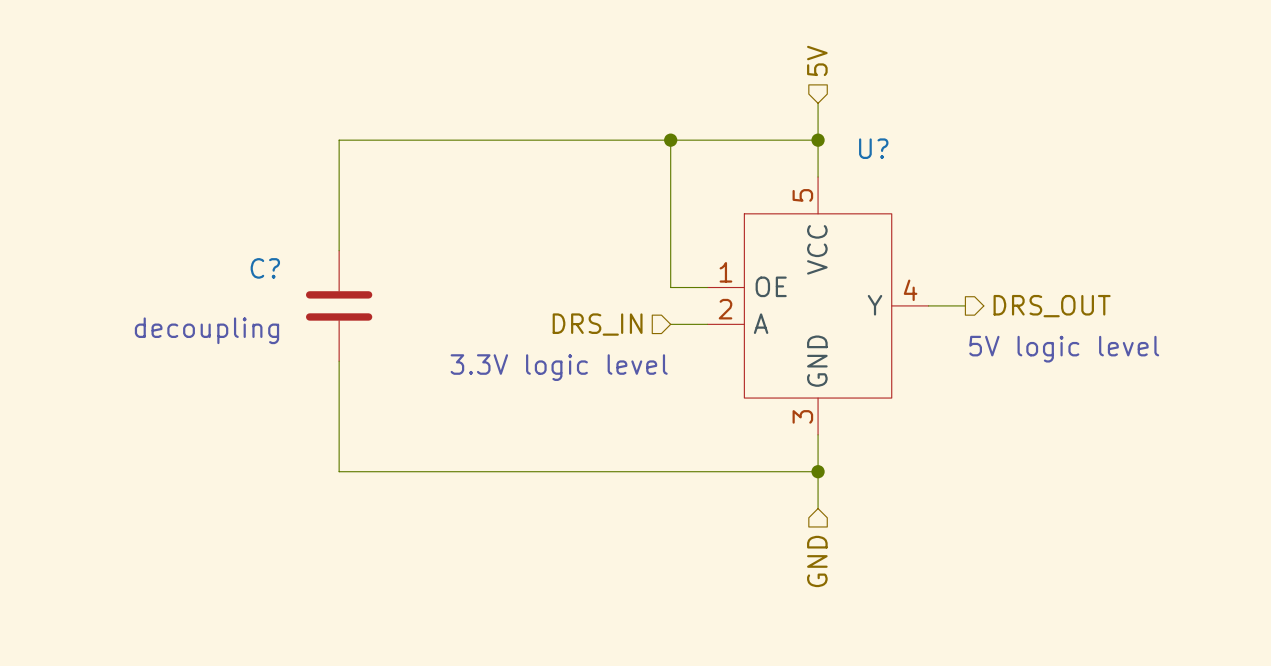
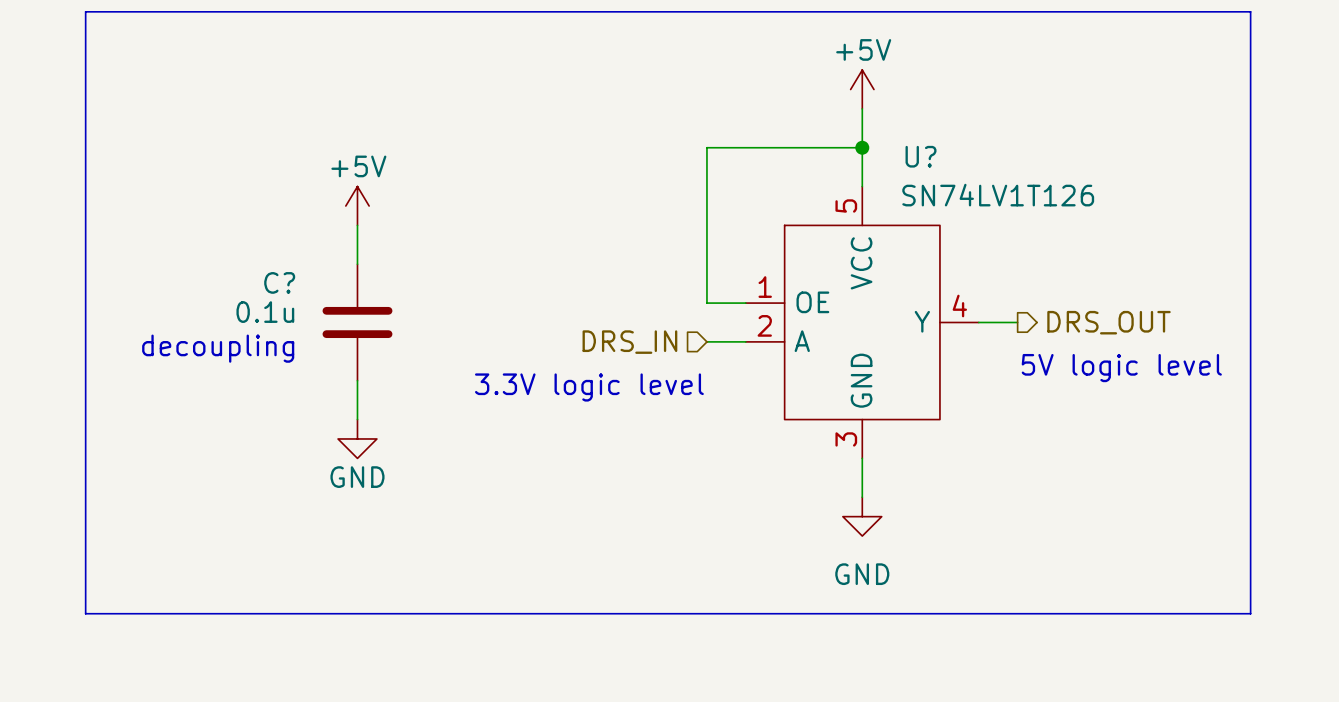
line: none -> (85, 11) (1250, 11) (1250, 613) (85, 613) (85, 11)
hierarchical label: 5V (817, 60) -> none
power symbol: none -> +5V (862, 89)
wire: (670, 140) (339, 140) (339, 213) -> none
junction: (670, 140) -> none
U? value: none -> SN74LV1T126 (998, 195)
power symbol: none -> +5V (357, 205)
C? value: none -> 0.1u (265, 312)
wire: (339, 398) (339, 471) (818, 471) (818, 508) -> none
power symbol: none -> GND (357, 438)
junction: (818, 471) -> none
power symbol: none -> GND (862, 516)
hierarchical label: GND (817, 561) -> none

